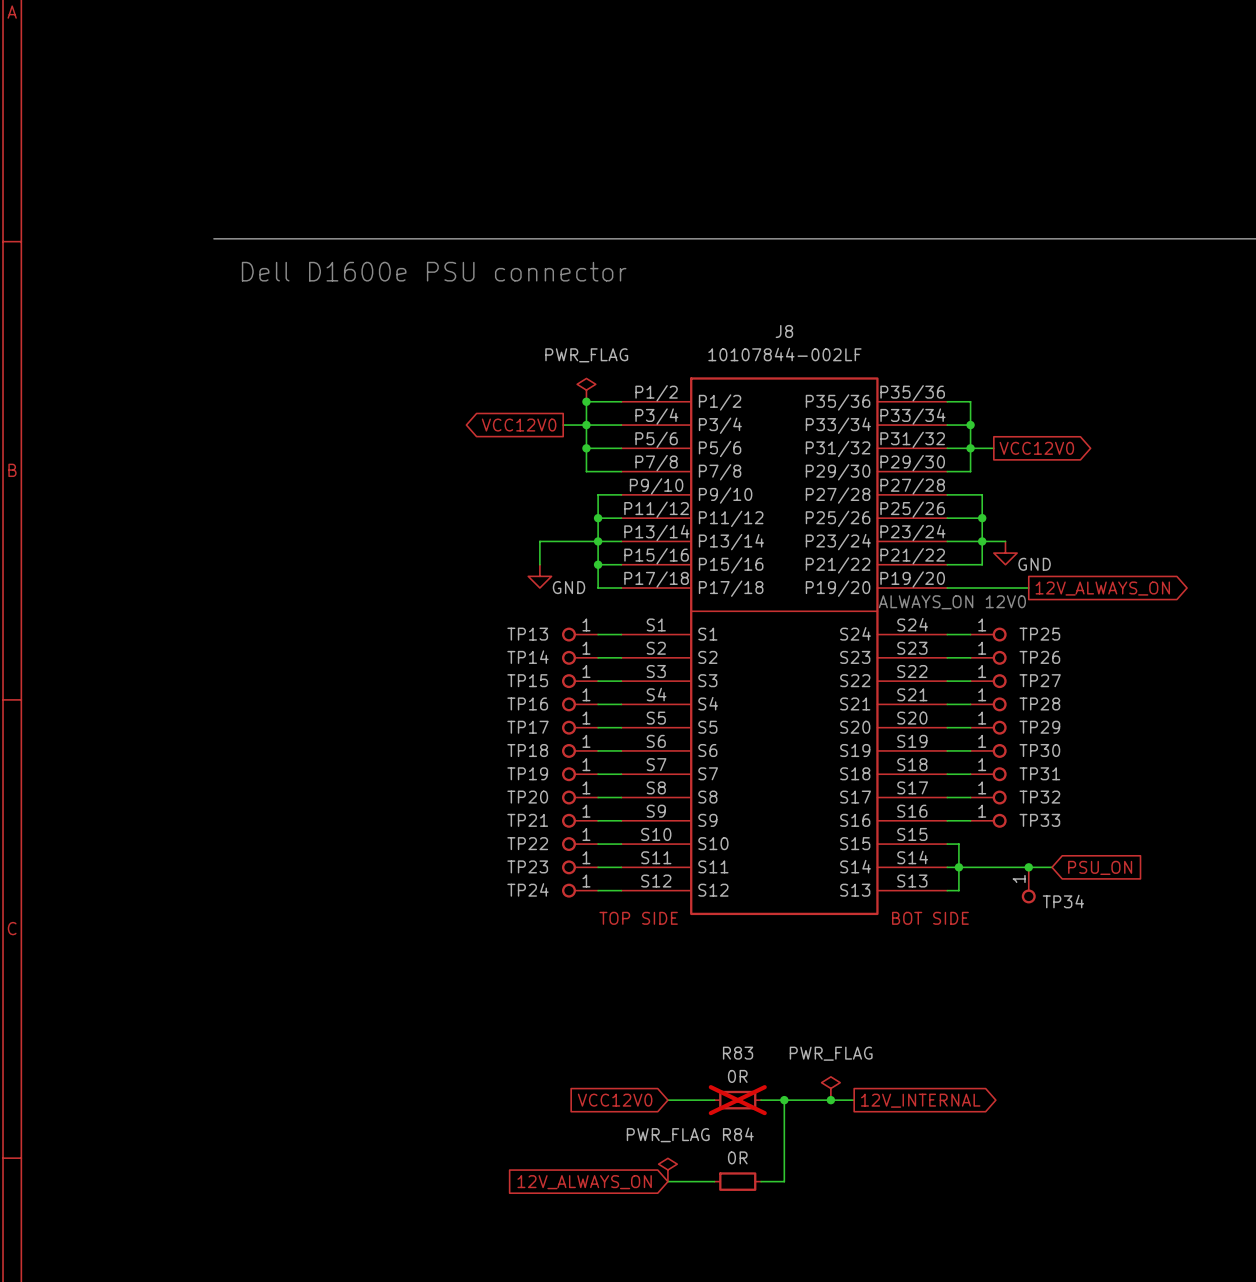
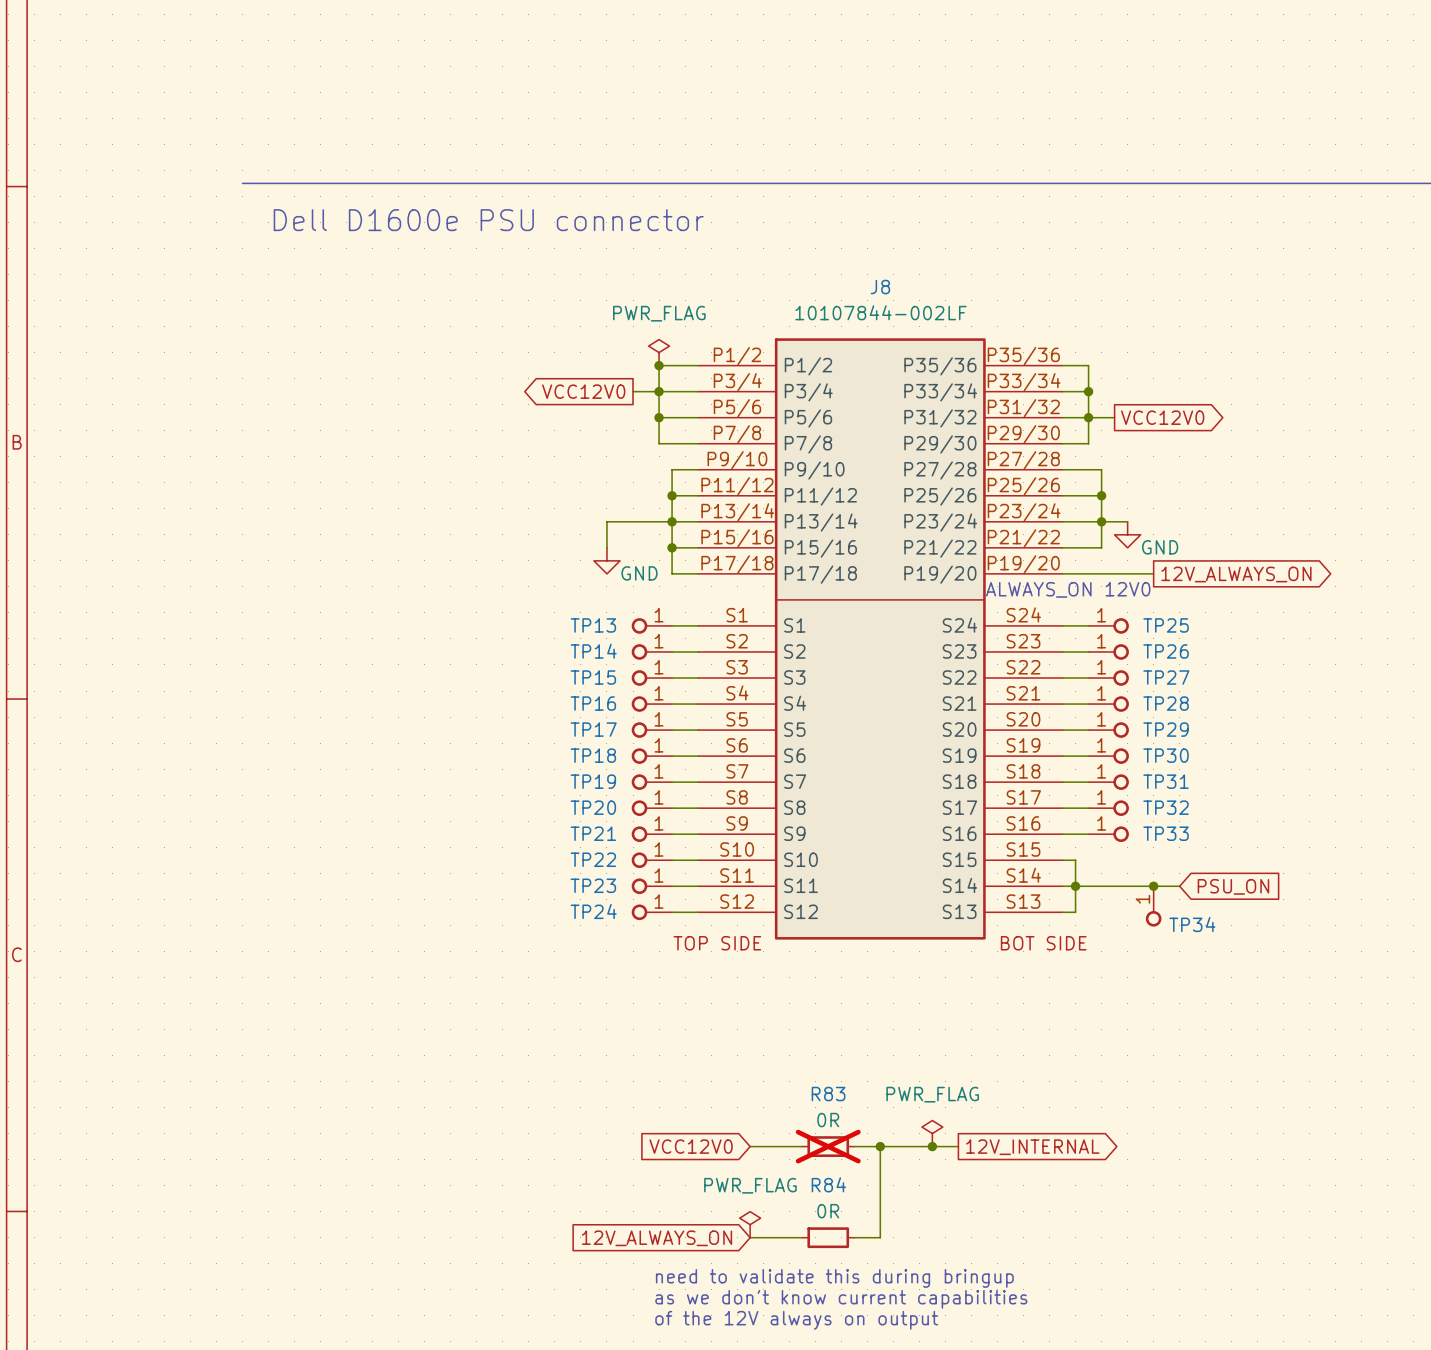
text: none -> need to validate this during bringup (834, 1278)
text: none -> as we don't know current capabilities (841, 1299)
text: none -> of the 12V always on output (796, 1320)

